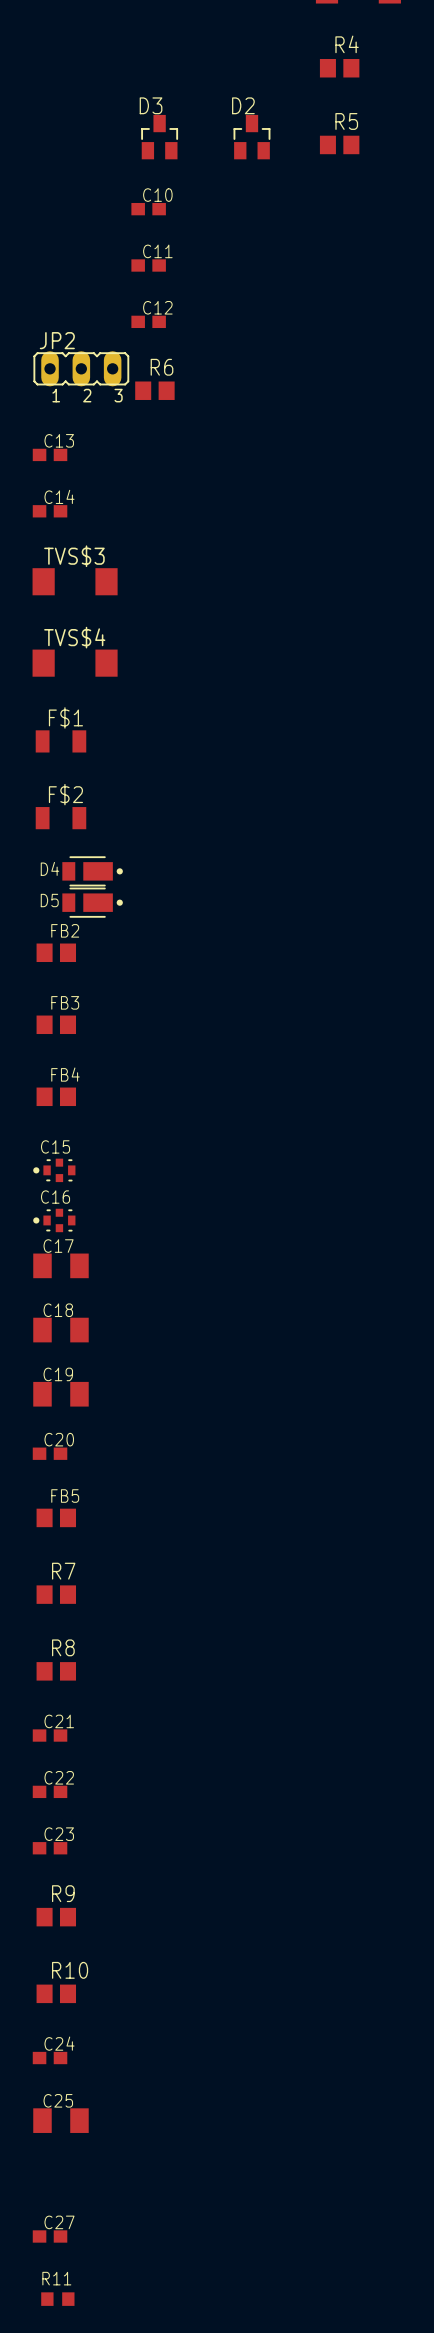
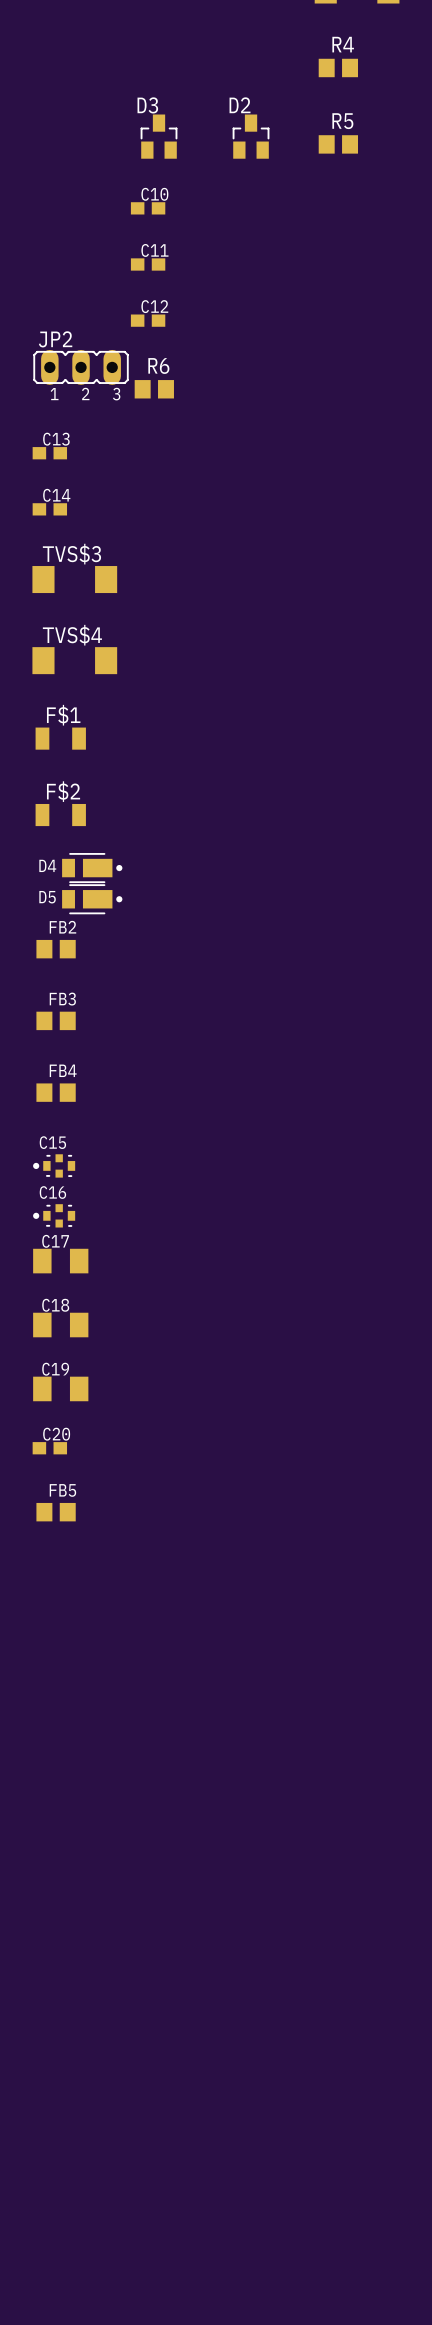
R7: (56, 1594) -> none
R8: (56, 1671) -> none
C21: (50, 1735) -> none
C22: (50, 1791) -> none
C23: (50, 1848) -> none
R9: (56, 1917) -> none
R10: (56, 1993) -> none
C24: (50, 2058) -> none
C25: (60, 2120) -> none
C27: (50, 2236) -> none
R11: (57, 2299) -> none

